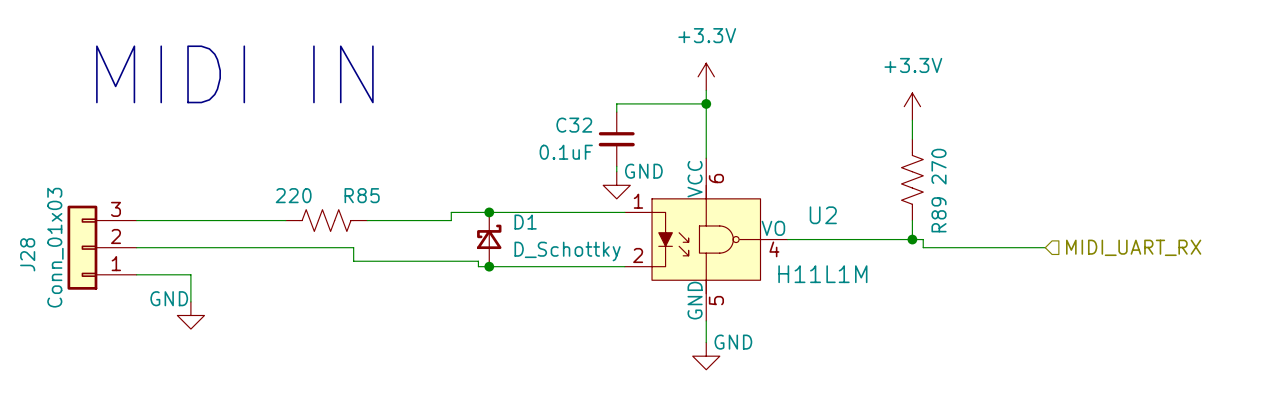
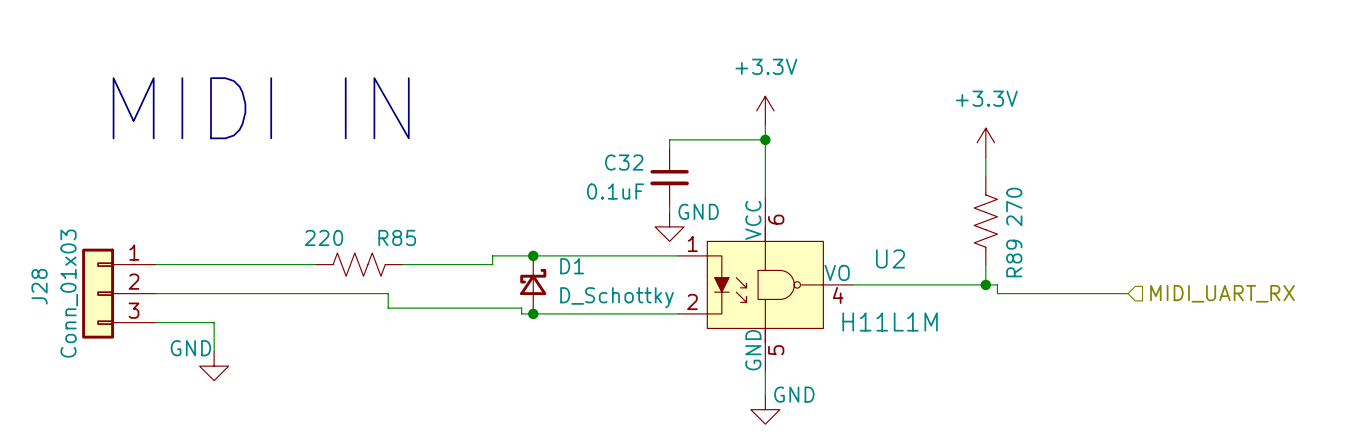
J28 flip: as is (82, 247) -> up-down (98, 293)

